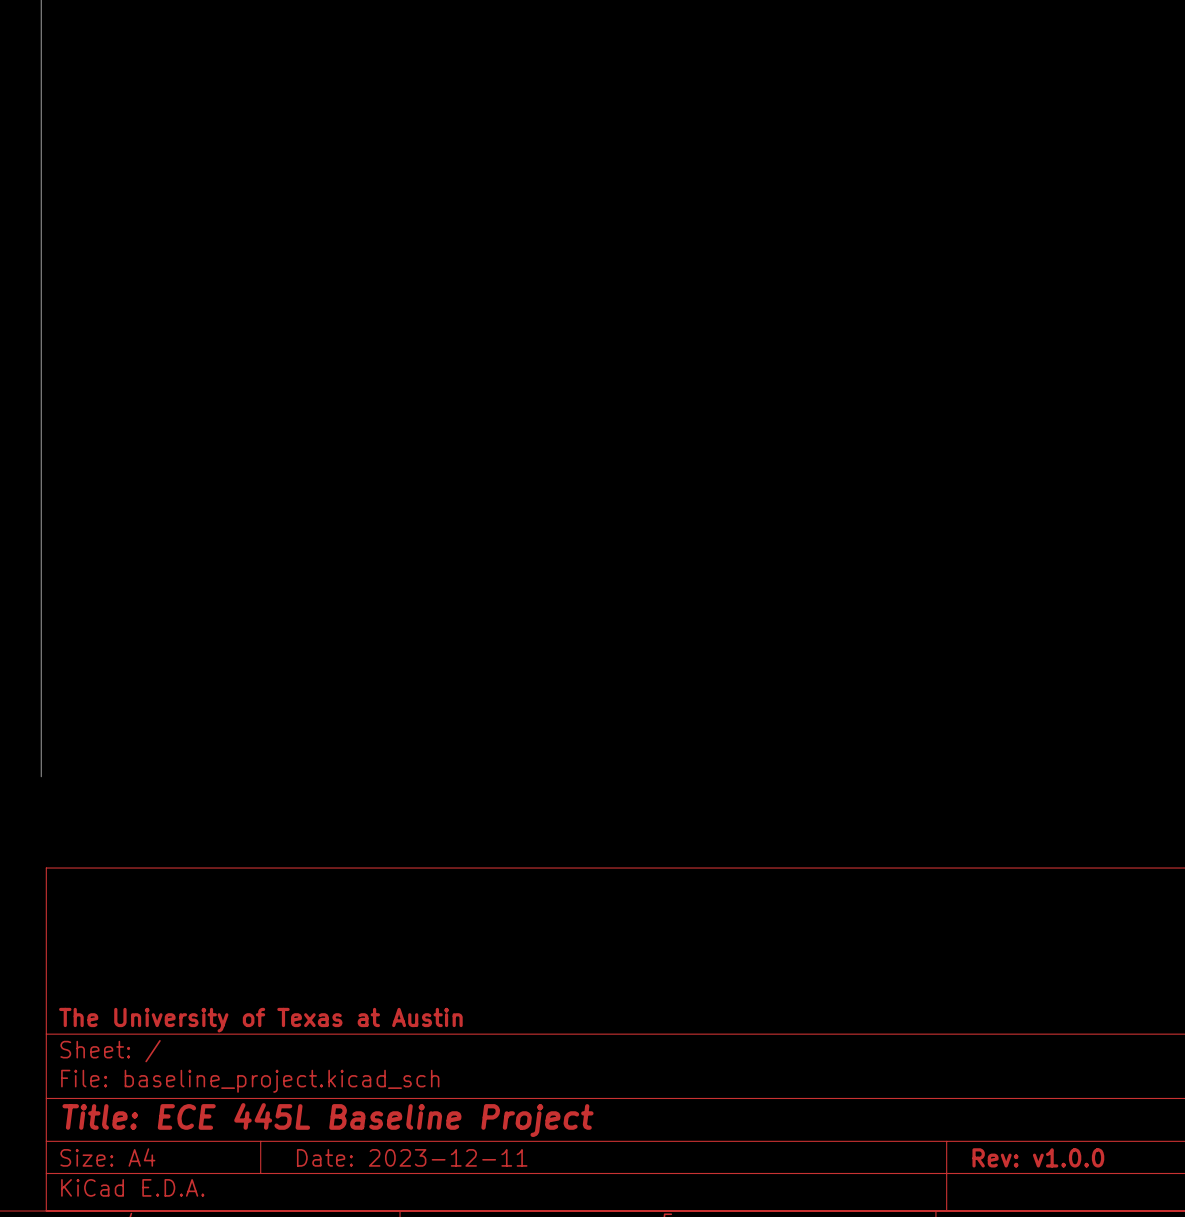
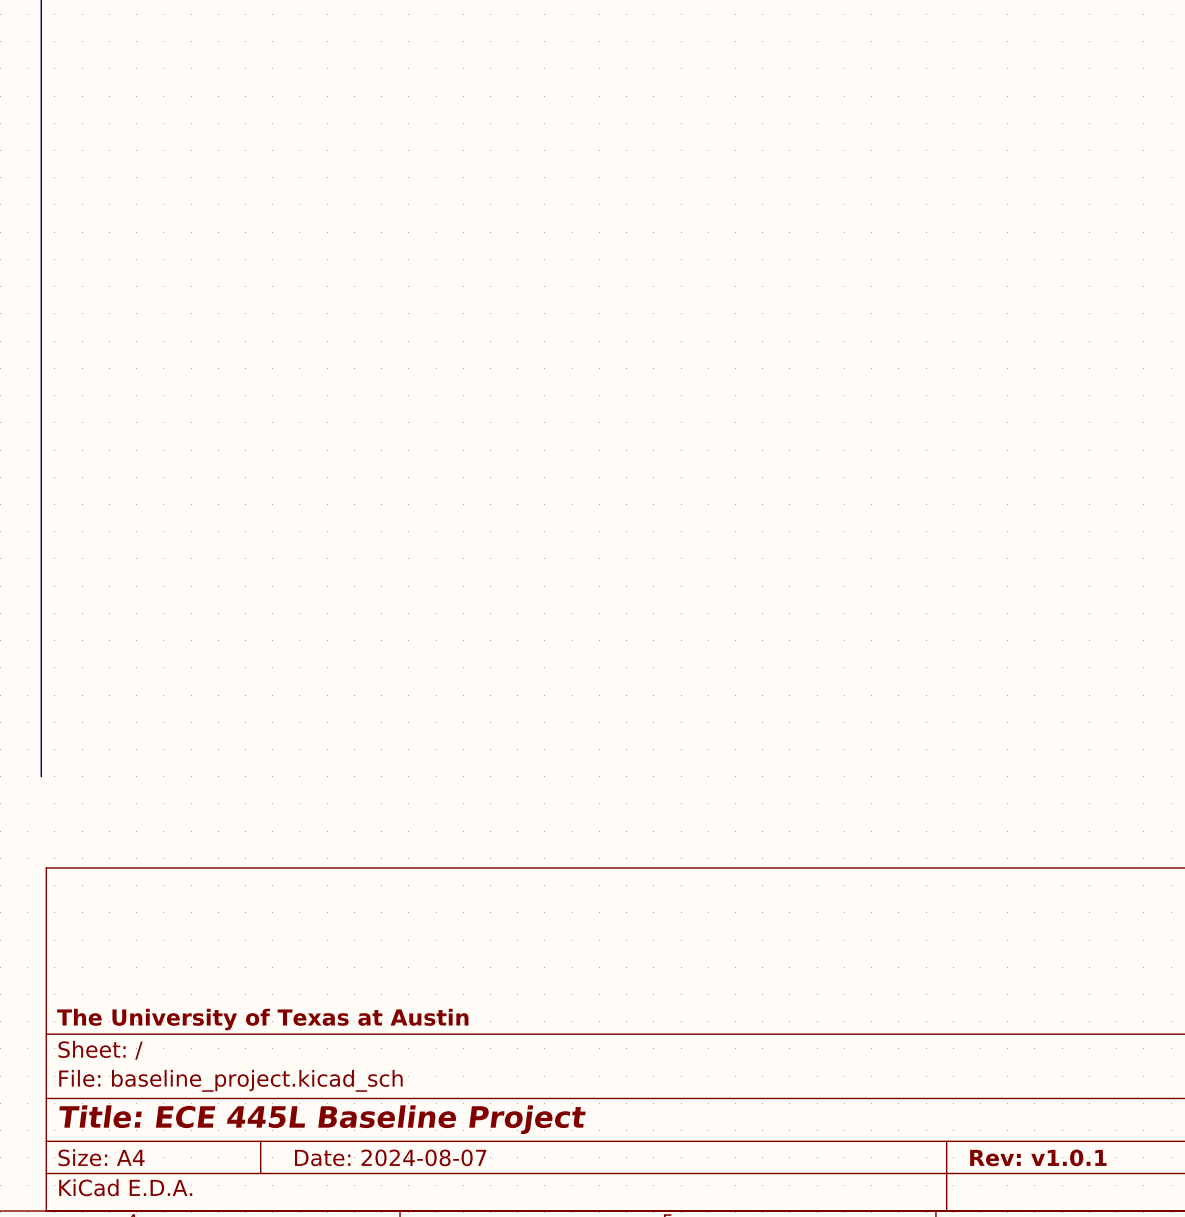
title block: Date: 2023-12-11 (412, 1157) -> Date: 2024-08-07 (390, 1157)
title block: Rev: v1.0.0 (1038, 1157) -> Rev: v1.0.1 (1038, 1157)

